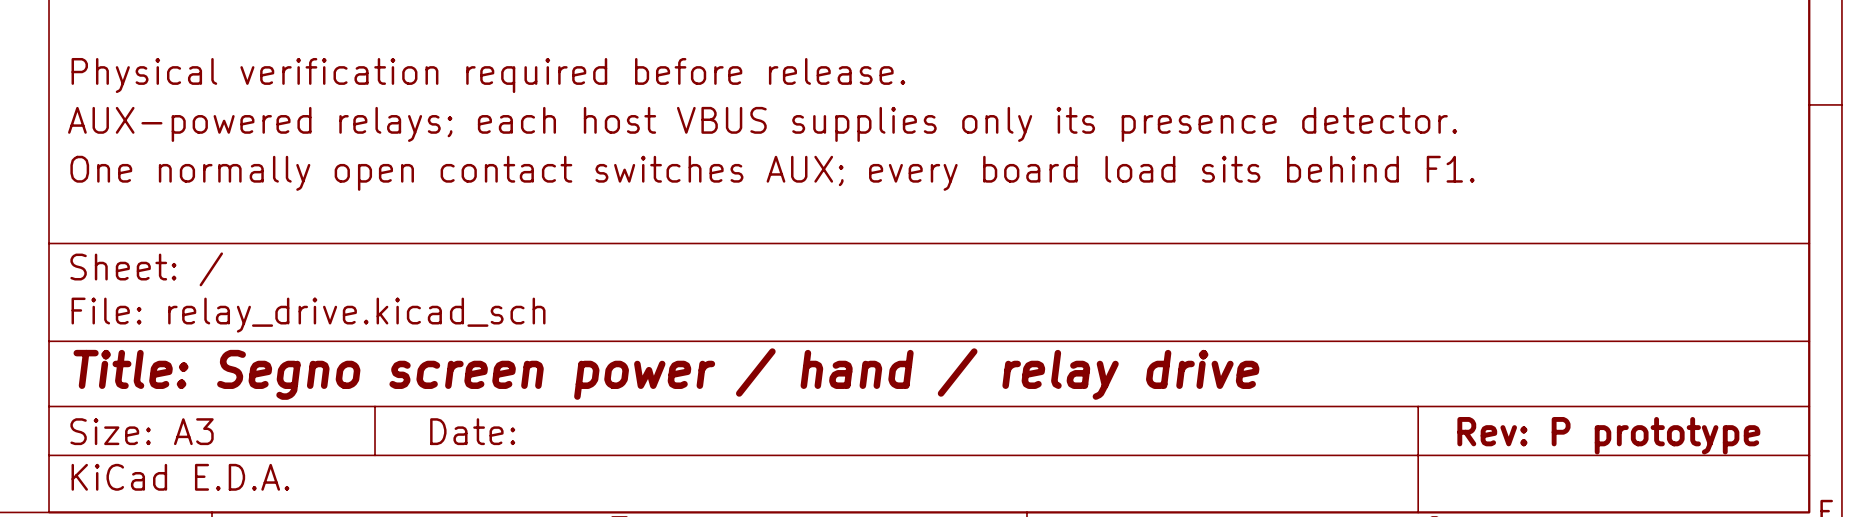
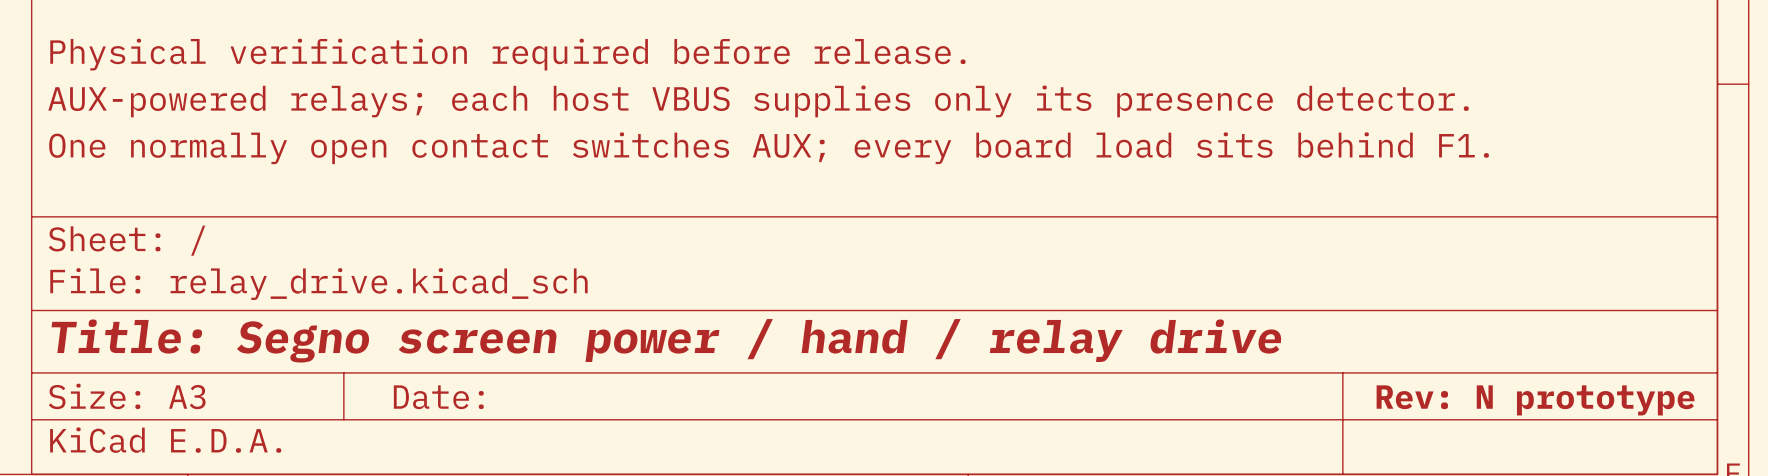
title block: Rev: P prototype (1608, 435) -> Rev: N prototype (1535, 400)

